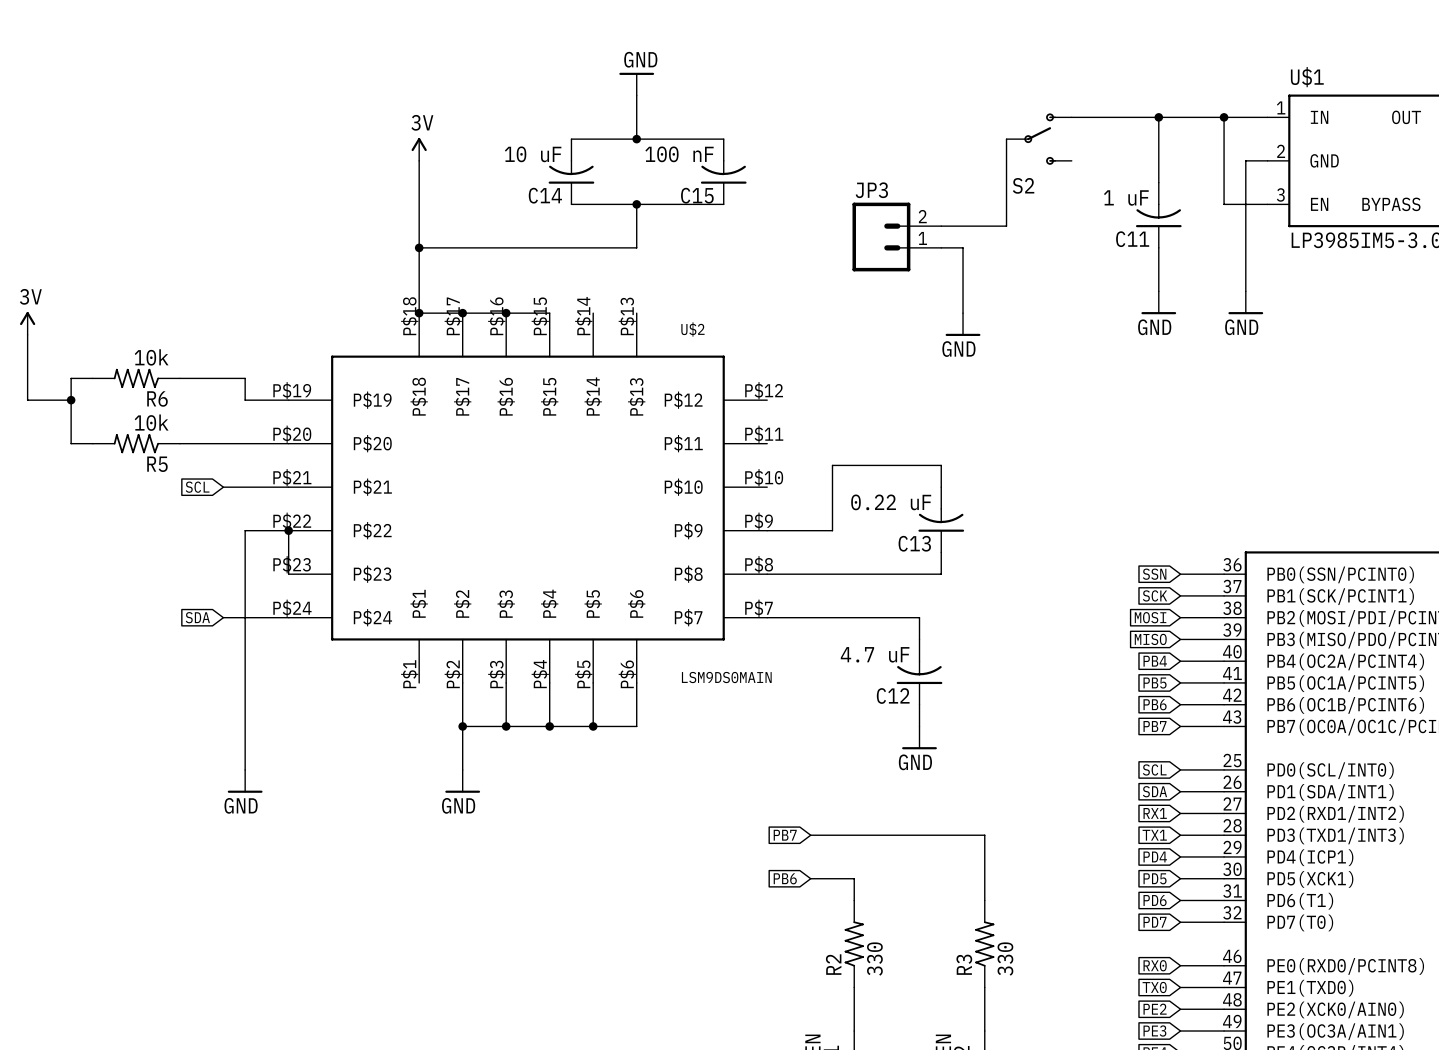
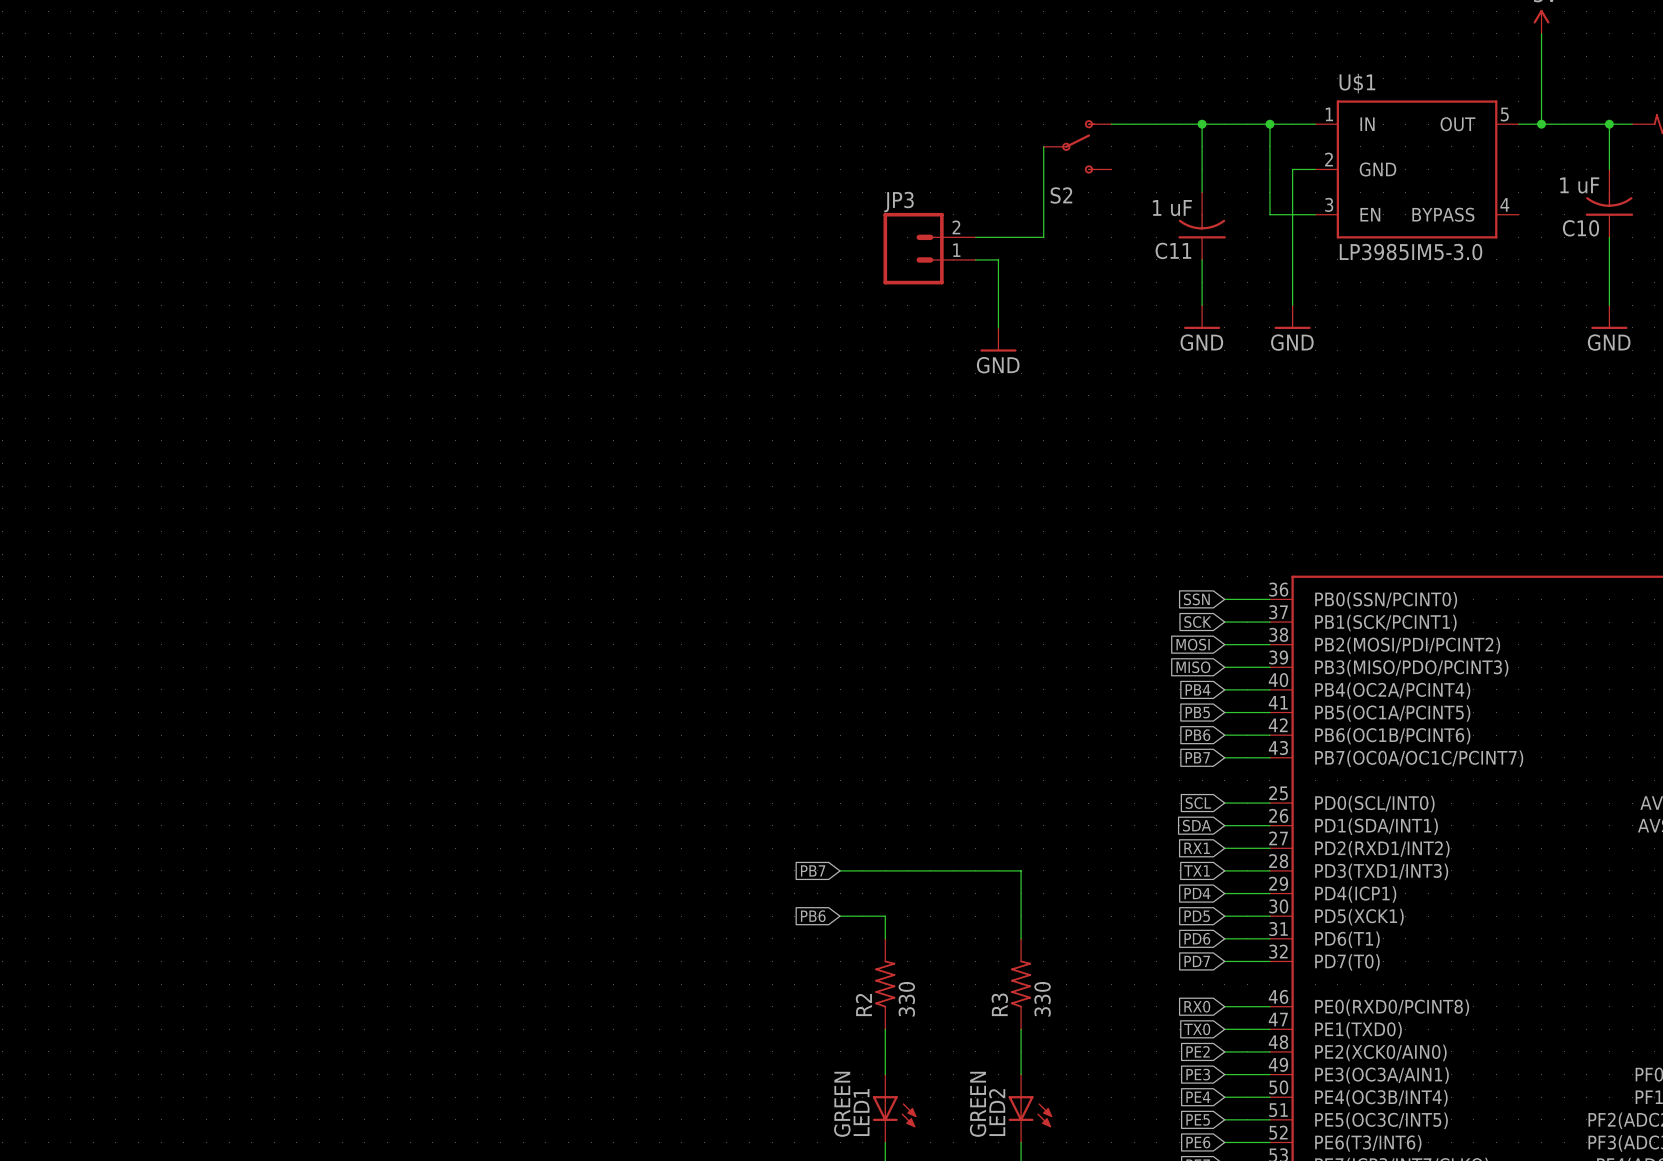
power symbol: GND (636, 84) -> none
wire: (636, 95) (636, 139) -> none
wire: (571, 139) (723, 139) -> none
junction: (636, 139) -> none
power symbol: 3V (419, 149) -> none
wire: (419, 160) (419, 313) (549, 313) -> none
C14: 10 uF (571, 171) -> none
C15: 100 nF (723, 171) -> none
wire: (571, 204) (723, 204) -> none
wire: (636, 204) (636, 247) (419, 247) -> none
junction: (636, 204) -> none
junction: (419, 247) -> none
junction: (419, 313) -> none
junction: (462, 313) -> none
junction: (506, 313) -> none
power symbol: 3V (27, 323) -> none
wire: (27, 334) (27, 400) (71, 400) -> none
wire: (92, 378) (71, 378) (71, 443) (92, 443) -> none
R6: 10k (136, 378) -> none
wire: (179, 378) (245, 378) (245, 400) (288, 400) -> none
junction: (71, 400) -> none
R5: 10k (136, 443) -> none
wire: (179, 443) (288, 443) -> none
global label: SCL (197, 487) -> none
wire: (223, 487) (288, 487) -> none
wire: (941, 487) (941, 465) (832, 465) (832, 530) (767, 530) -> none
U$2: LSM9DS0MAIN (527, 498) -> none
C13: 0.22 uF (941, 519) -> none
junction: (288, 530) -> none
wire: (941, 552) (941, 574) (767, 574) -> none
wire: (288, 574) (288, 530) (245, 530) (245, 769) -> none
global label: SDA (197, 617) -> none
wire: (223, 617) (288, 617) -> none
wire: (767, 617) (919, 617) (919, 639) -> none
C12: 4.7 uF (919, 672) -> none
wire: (462, 682) (462, 769) -> none
wire: (506, 682) (506, 726) -> none
wire: (549, 682) (549, 726) -> none
wire: (593, 682) (593, 726) -> none
wire: (636, 682) (636, 726) (462, 726) -> none
wire: (919, 704) (919, 726) -> none
junction: (462, 726) -> none
junction: (506, 726) -> none
junction: (549, 726) -> none
junction: (593, 726) -> none
power symbol: GND (919, 737) -> none
power symbol: GND (245, 781) -> none
power symbol: GND (462, 781) -> none

